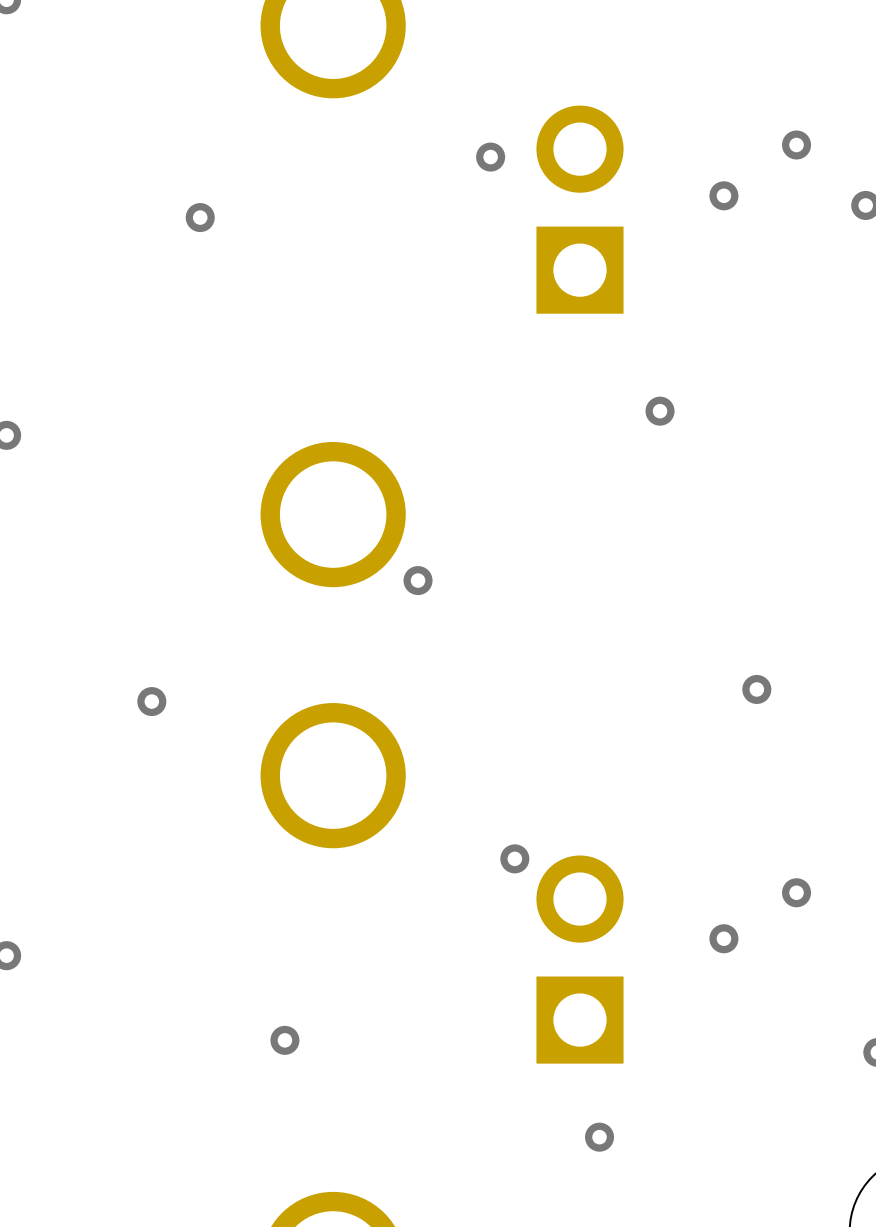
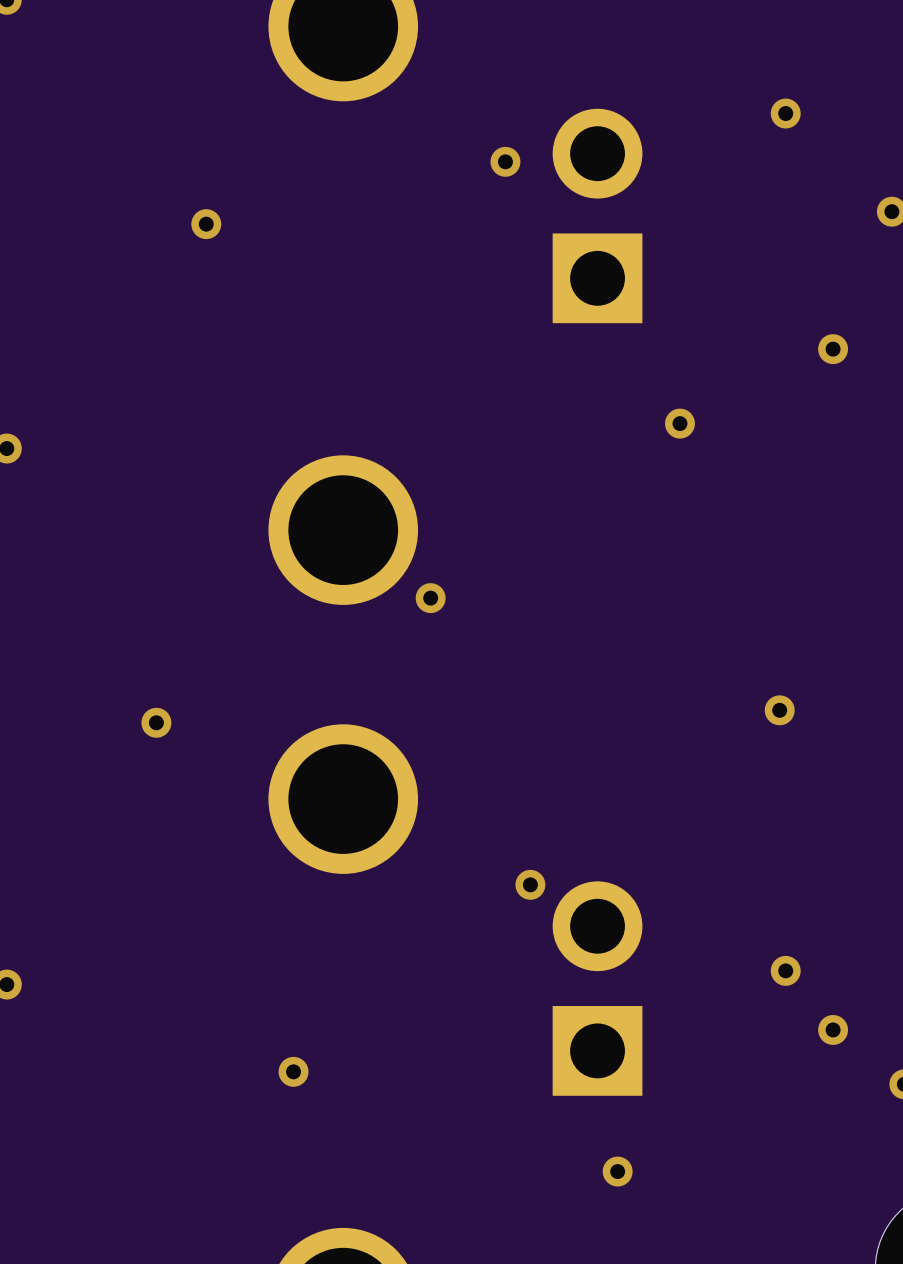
via: none -> (785, 113)
via: (796, 144) -> none
via: (723, 195) -> none
via: none -> (833, 349)
via: (796, 892) -> none
via: (723, 938) -> none
via: none -> (785, 970)
via: none -> (833, 1029)

